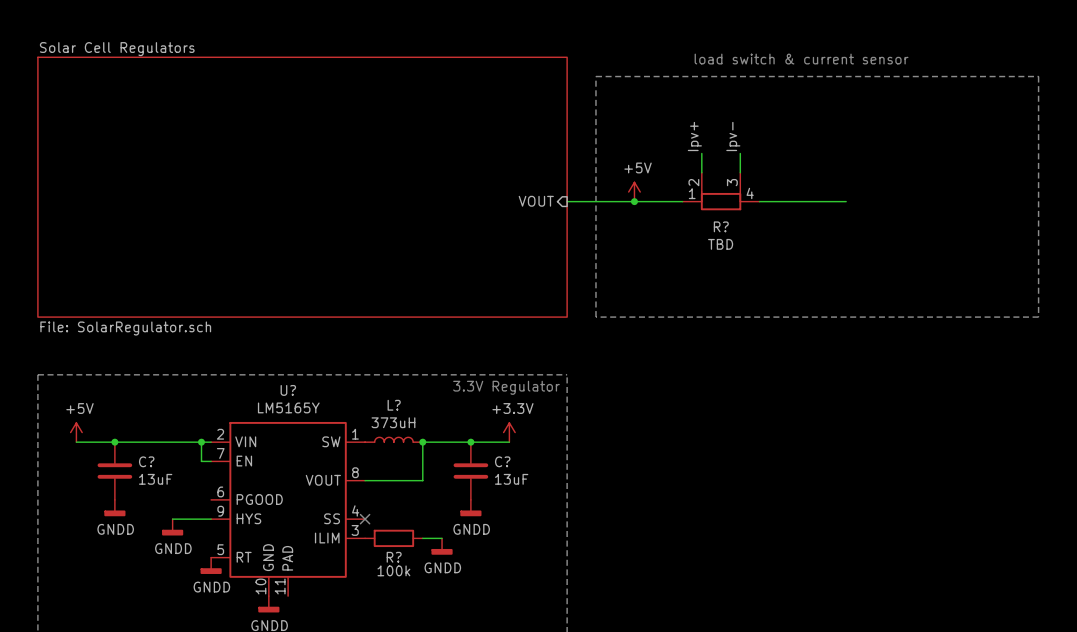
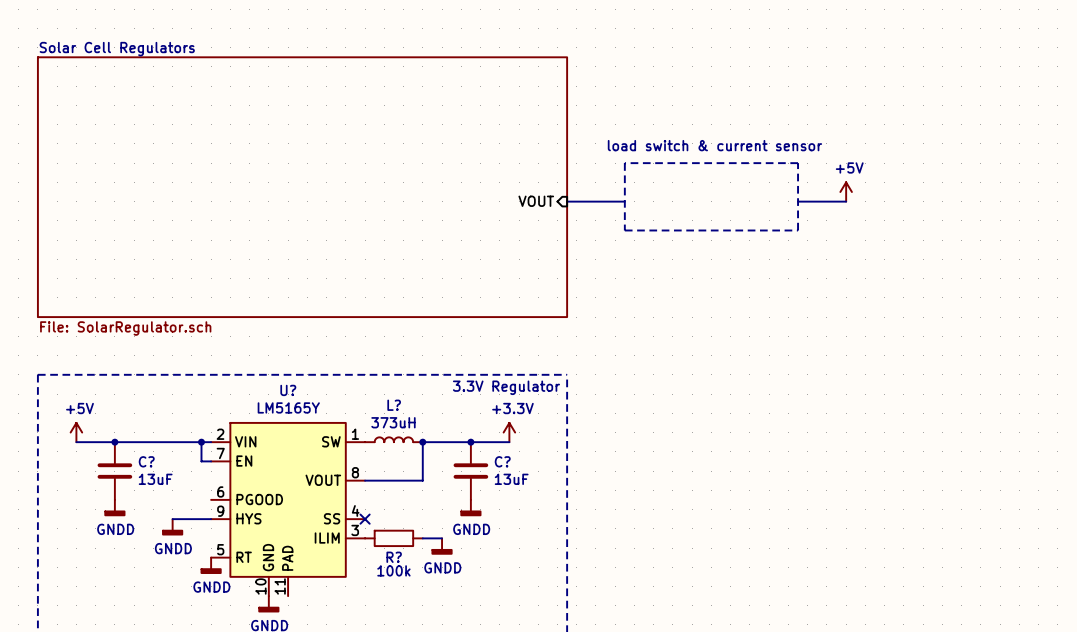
text position: load switch & current sensor (801, 59) -> load switch & current sensor (714, 145)
line: (595, 76) (1038, 76) (1038, 317) (595, 317) (595, 76) -> none
label: Ipv+ (694, 136) -> none
label: Ipv- (733, 136) -> none
wire: (701, 153) (701, 172) -> none
wire: (740, 153) (740, 172) -> none
line: none -> (624, 163) (624, 230) (798, 230) (798, 163) (624, 163)
R?: TBD (721, 191) -> none
power symbol: +5V (634, 192) -> none
power symbol: none -> +5V (846, 192)
wire: (624, 201) (682, 201) -> none
junction: (634, 201) -> none
wire: (759, 201) (798, 201) -> none

